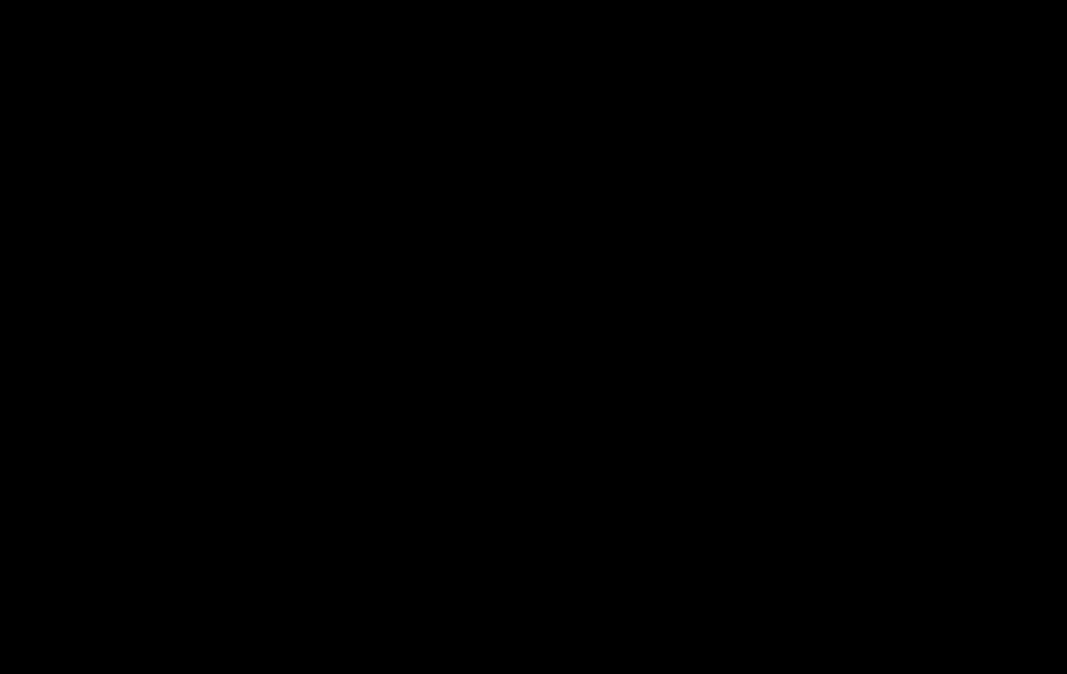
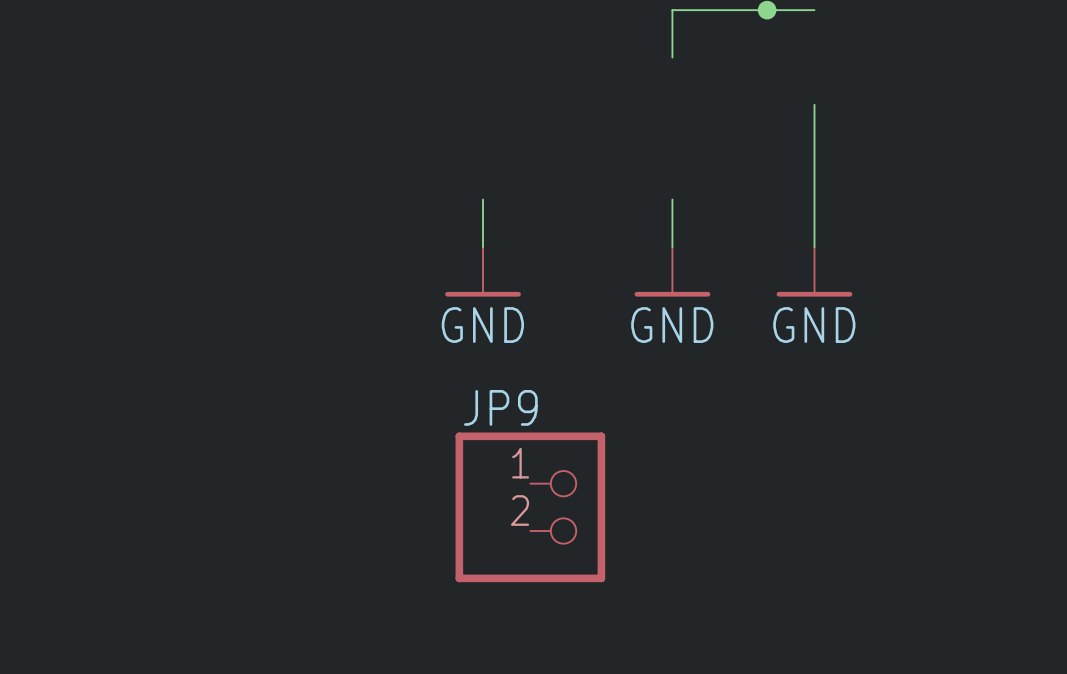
junction: none -> (767, 10)
wire: none -> (814, 10) (672, 10) (672, 57)
wire: none -> (814, 104) (814, 246)
wire: none -> (483, 199) (483, 246)
wire: none -> (672, 199) (672, 246)
power symbol: none -> GND (483, 271)
power symbol: none -> GND (672, 271)
power symbol: none -> GND (814, 271)
JP9: none -> (530, 507)

